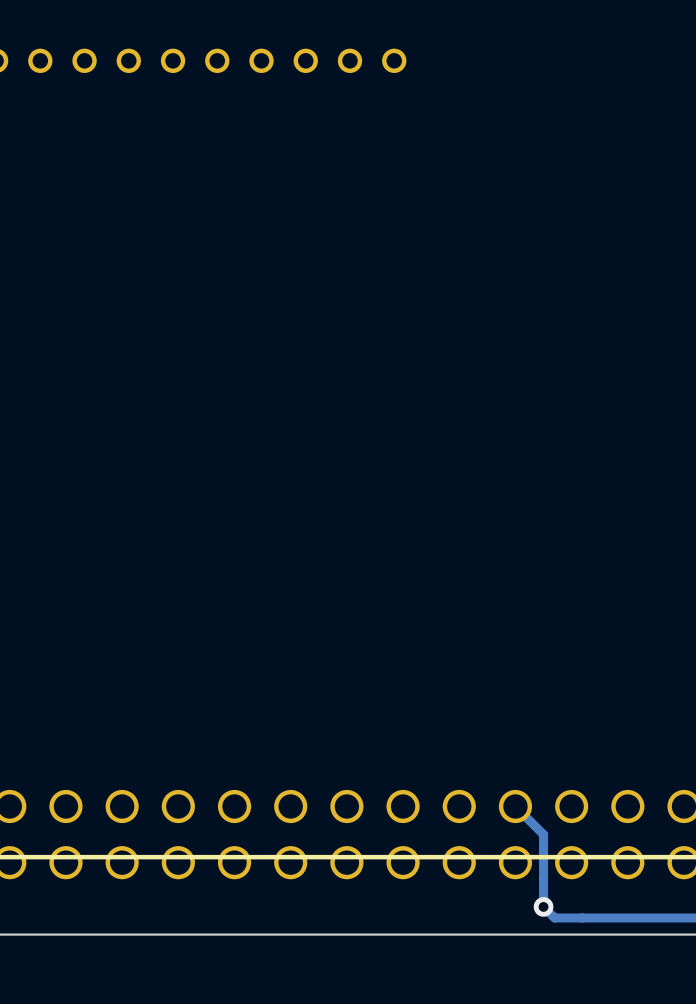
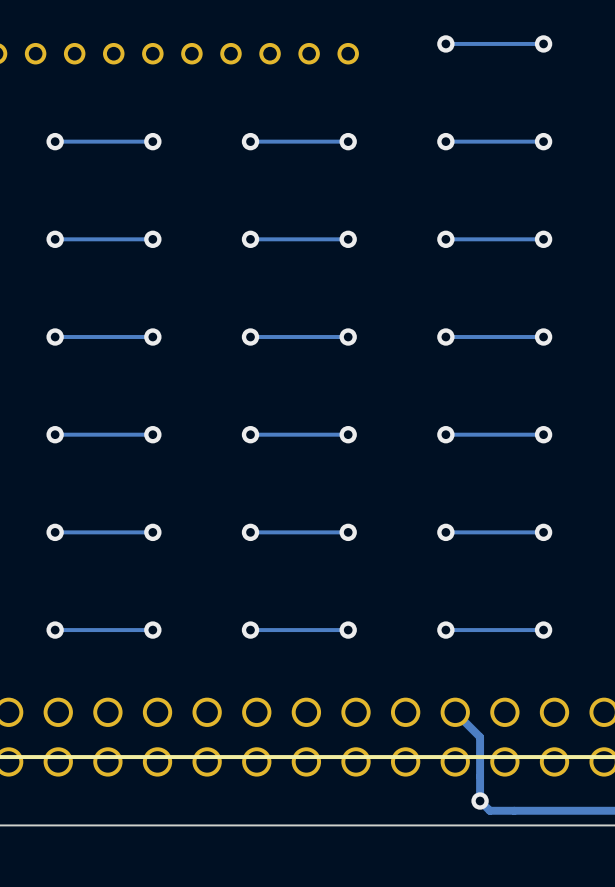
via: none -> (445, 43)
track: none -> (543, 43) (445, 43)
via: none -> (543, 43)
via: none -> (55, 141)
track: none -> (152, 141) (55, 141)
via: none -> (152, 141)
via: none -> (250, 141)
track: none -> (348, 141) (250, 141)
via: none -> (348, 141)
via: none -> (445, 141)
track: none -> (543, 141) (445, 141)
via: none -> (543, 141)
via: none -> (55, 239)
track: none -> (152, 239) (55, 239)
via: none -> (152, 239)
via: none -> (250, 239)
track: none -> (348, 239) (250, 239)
via: none -> (348, 239)
via: none -> (445, 239)
track: none -> (543, 239) (445, 239)
via: none -> (543, 239)
via: none -> (55, 337)
track: none -> (152, 337) (55, 337)
via: none -> (152, 337)
via: none -> (250, 337)
track: none -> (348, 337) (250, 337)
via: none -> (348, 337)
via: none -> (445, 337)
track: none -> (543, 337) (445, 337)
via: none -> (543, 337)
via: none -> (55, 434)
track: none -> (152, 434) (55, 434)
via: none -> (152, 434)
via: none -> (250, 434)
track: none -> (348, 434) (250, 434)
via: none -> (348, 434)
via: none -> (445, 434)
track: none -> (543, 434) (445, 434)
via: none -> (543, 434)
via: none -> (55, 532)
track: none -> (152, 532) (55, 532)
via: none -> (152, 532)
via: none -> (250, 532)
track: none -> (348, 532) (250, 532)
via: none -> (348, 532)
via: none -> (445, 532)
track: none -> (543, 532) (445, 532)
via: none -> (543, 532)
via: none -> (55, 630)
track: none -> (152, 630) (55, 630)
via: none -> (152, 630)
via: none -> (250, 630)
track: none -> (348, 630) (250, 630)
via: none -> (348, 630)
via: none -> (445, 630)
track: none -> (543, 630) (445, 630)
via: none -> (543, 630)

